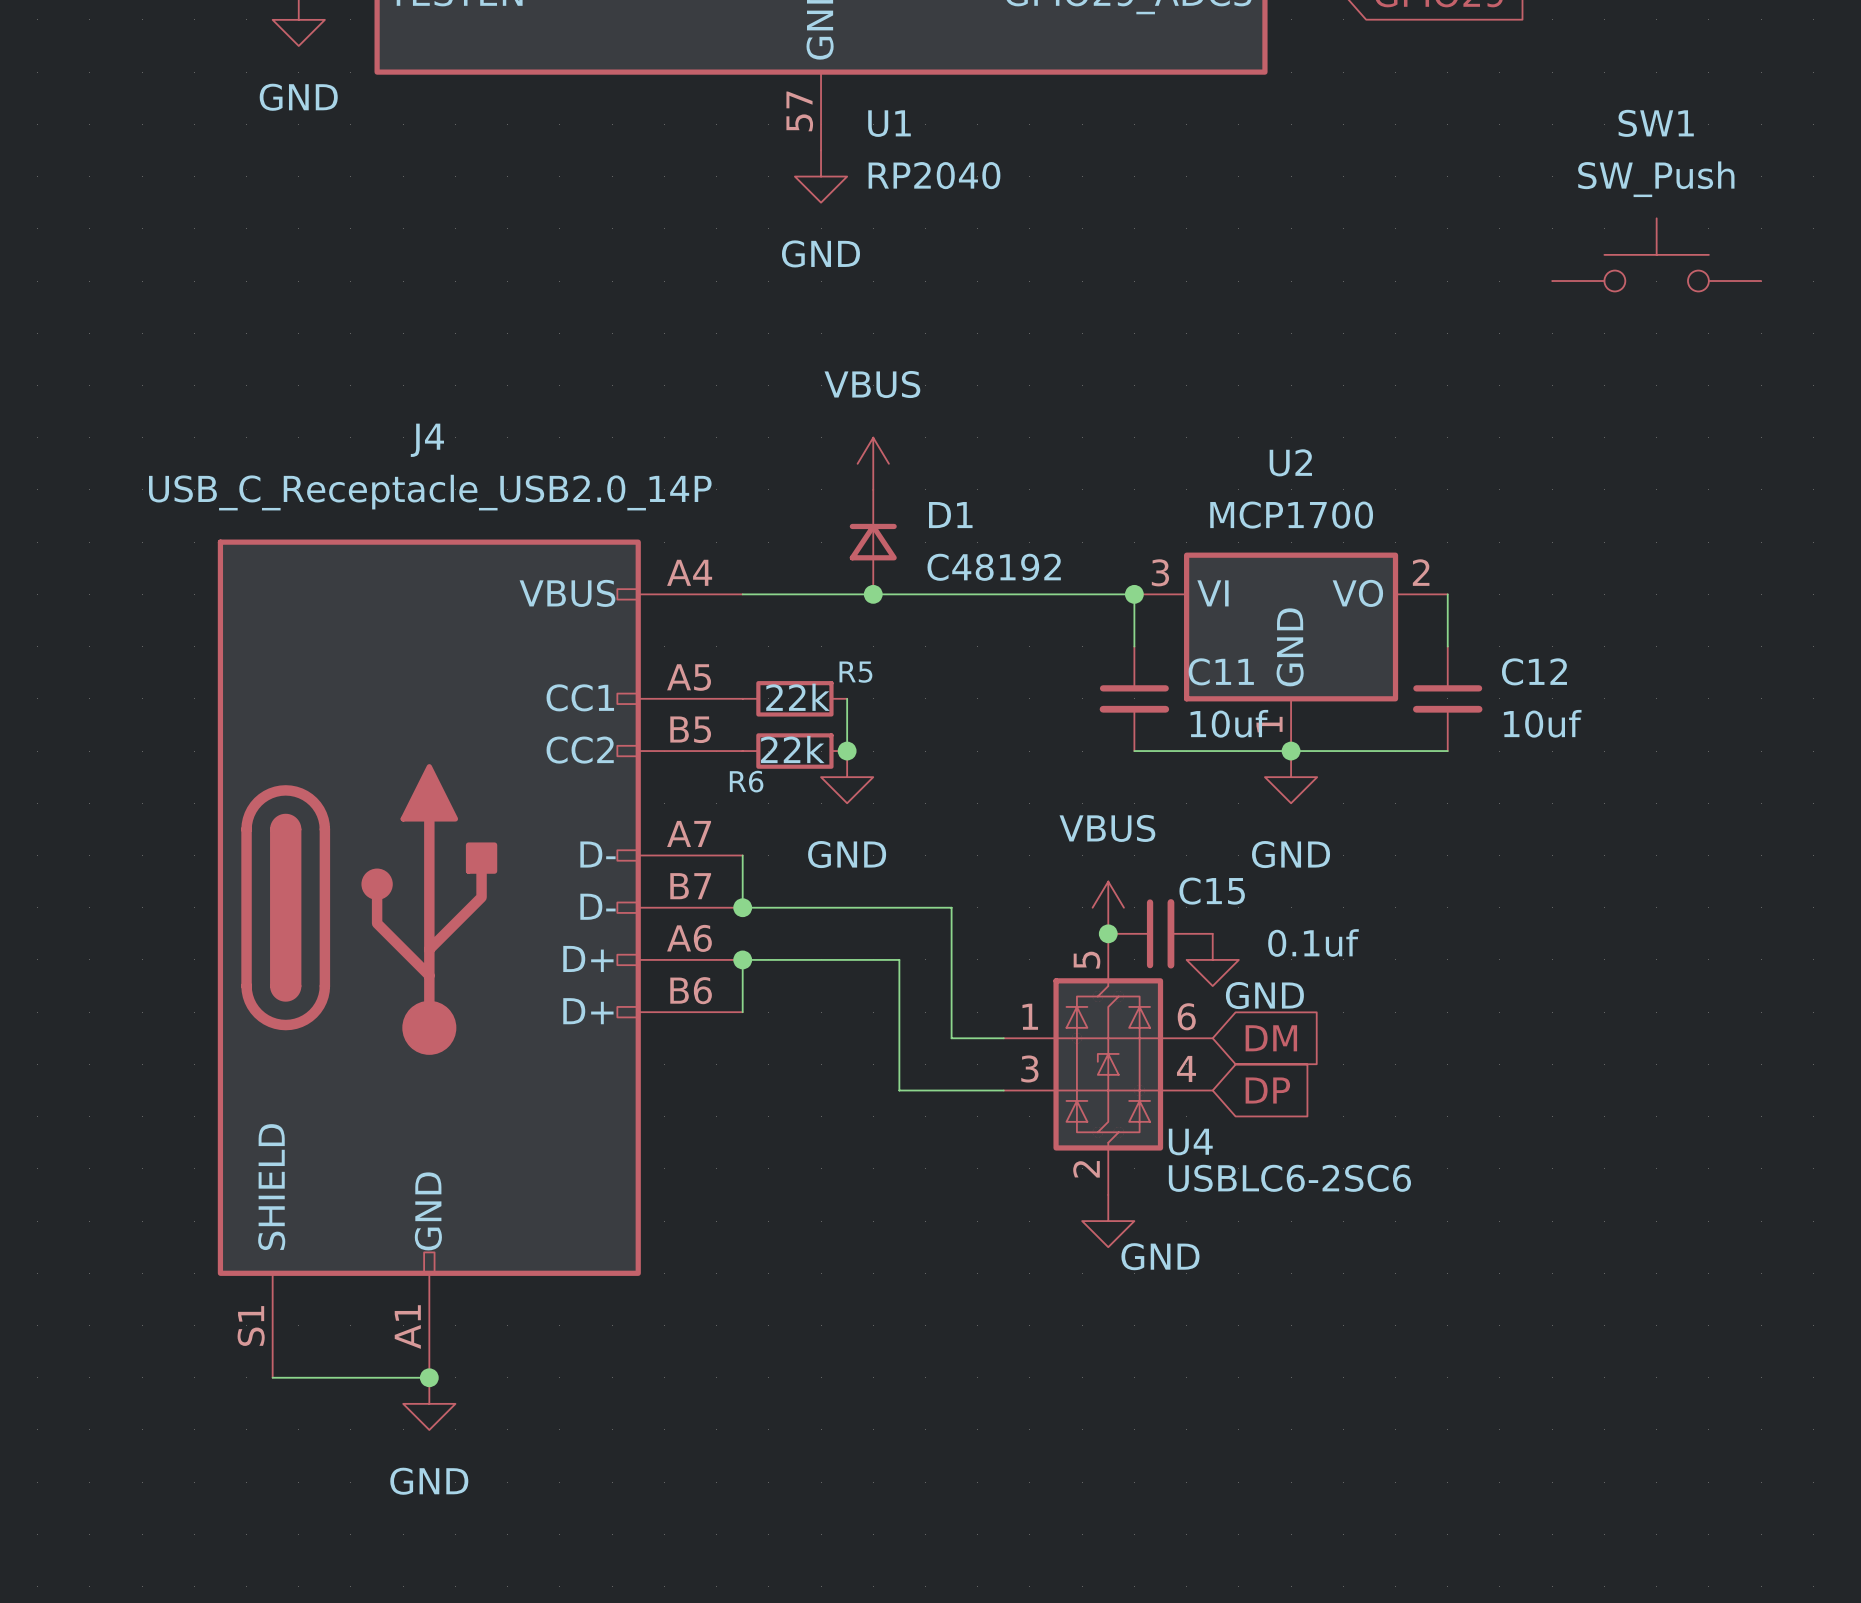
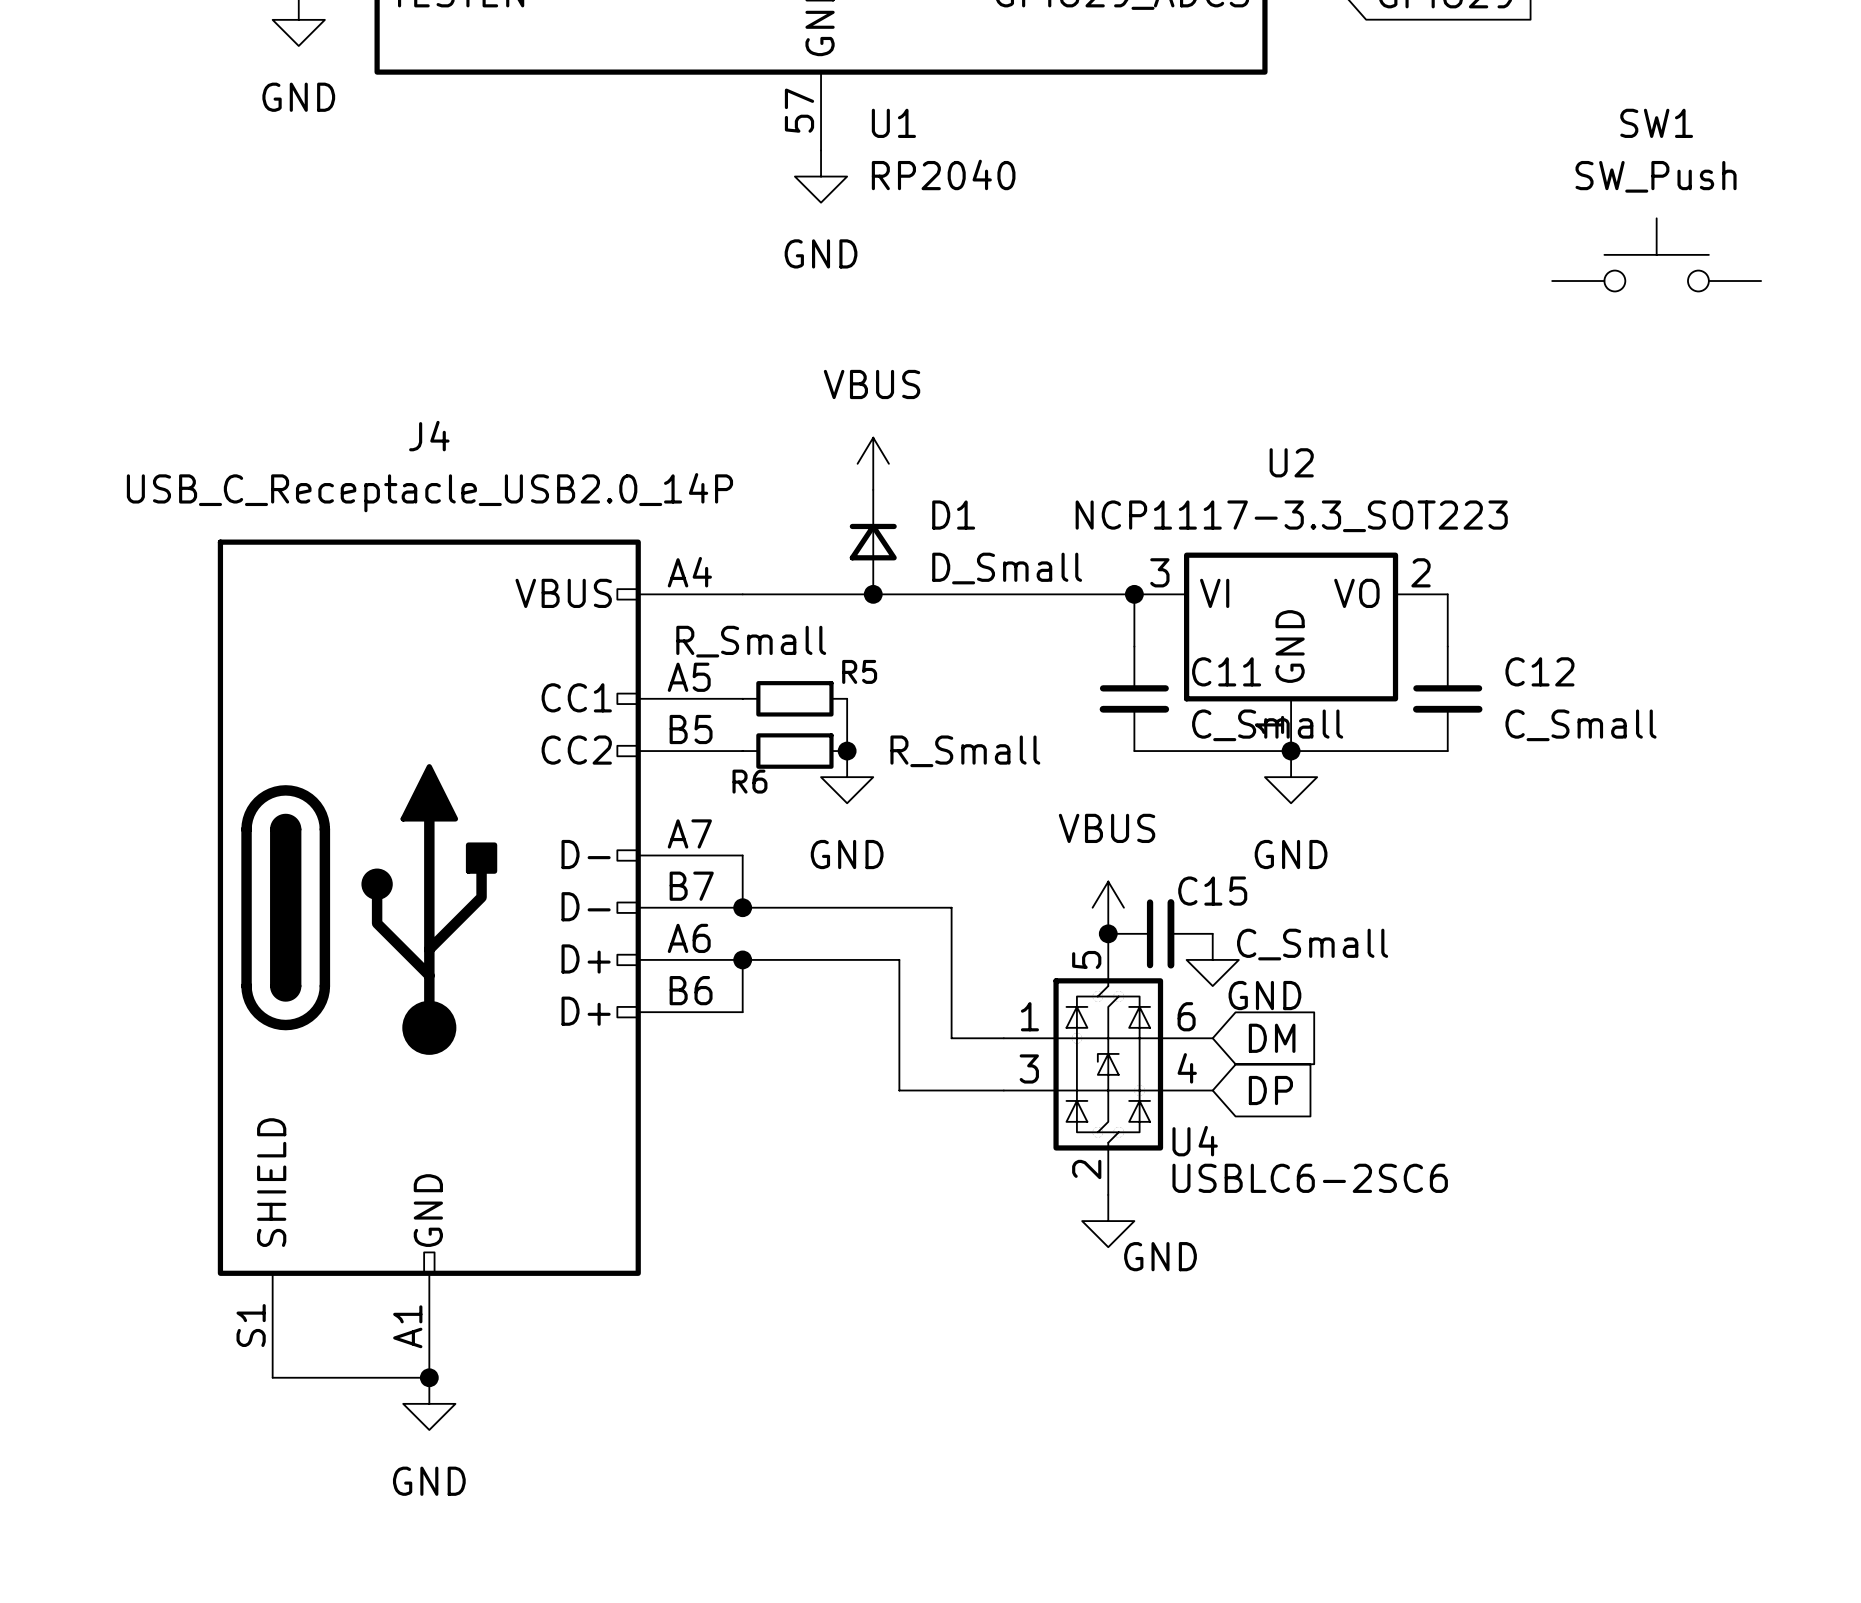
U2 value: MCP1700 (1291, 515) -> NCP1117-3.3_SOT223 (1291, 516)
D1 value: C48192 (994, 567) -> D_Small (1007, 568)
R5 value: 22k (798, 697) -> R_Small (751, 641)
C11 value: 10uf (1229, 723) -> C_Small (1267, 725)
C12 value: 10uf (1542, 723) -> C_Small (1580, 725)
R6 value: 22k (792, 749) -> R_Small (965, 751)
C15 value: 0.1uf (1313, 943) -> C_Small (1312, 944)

